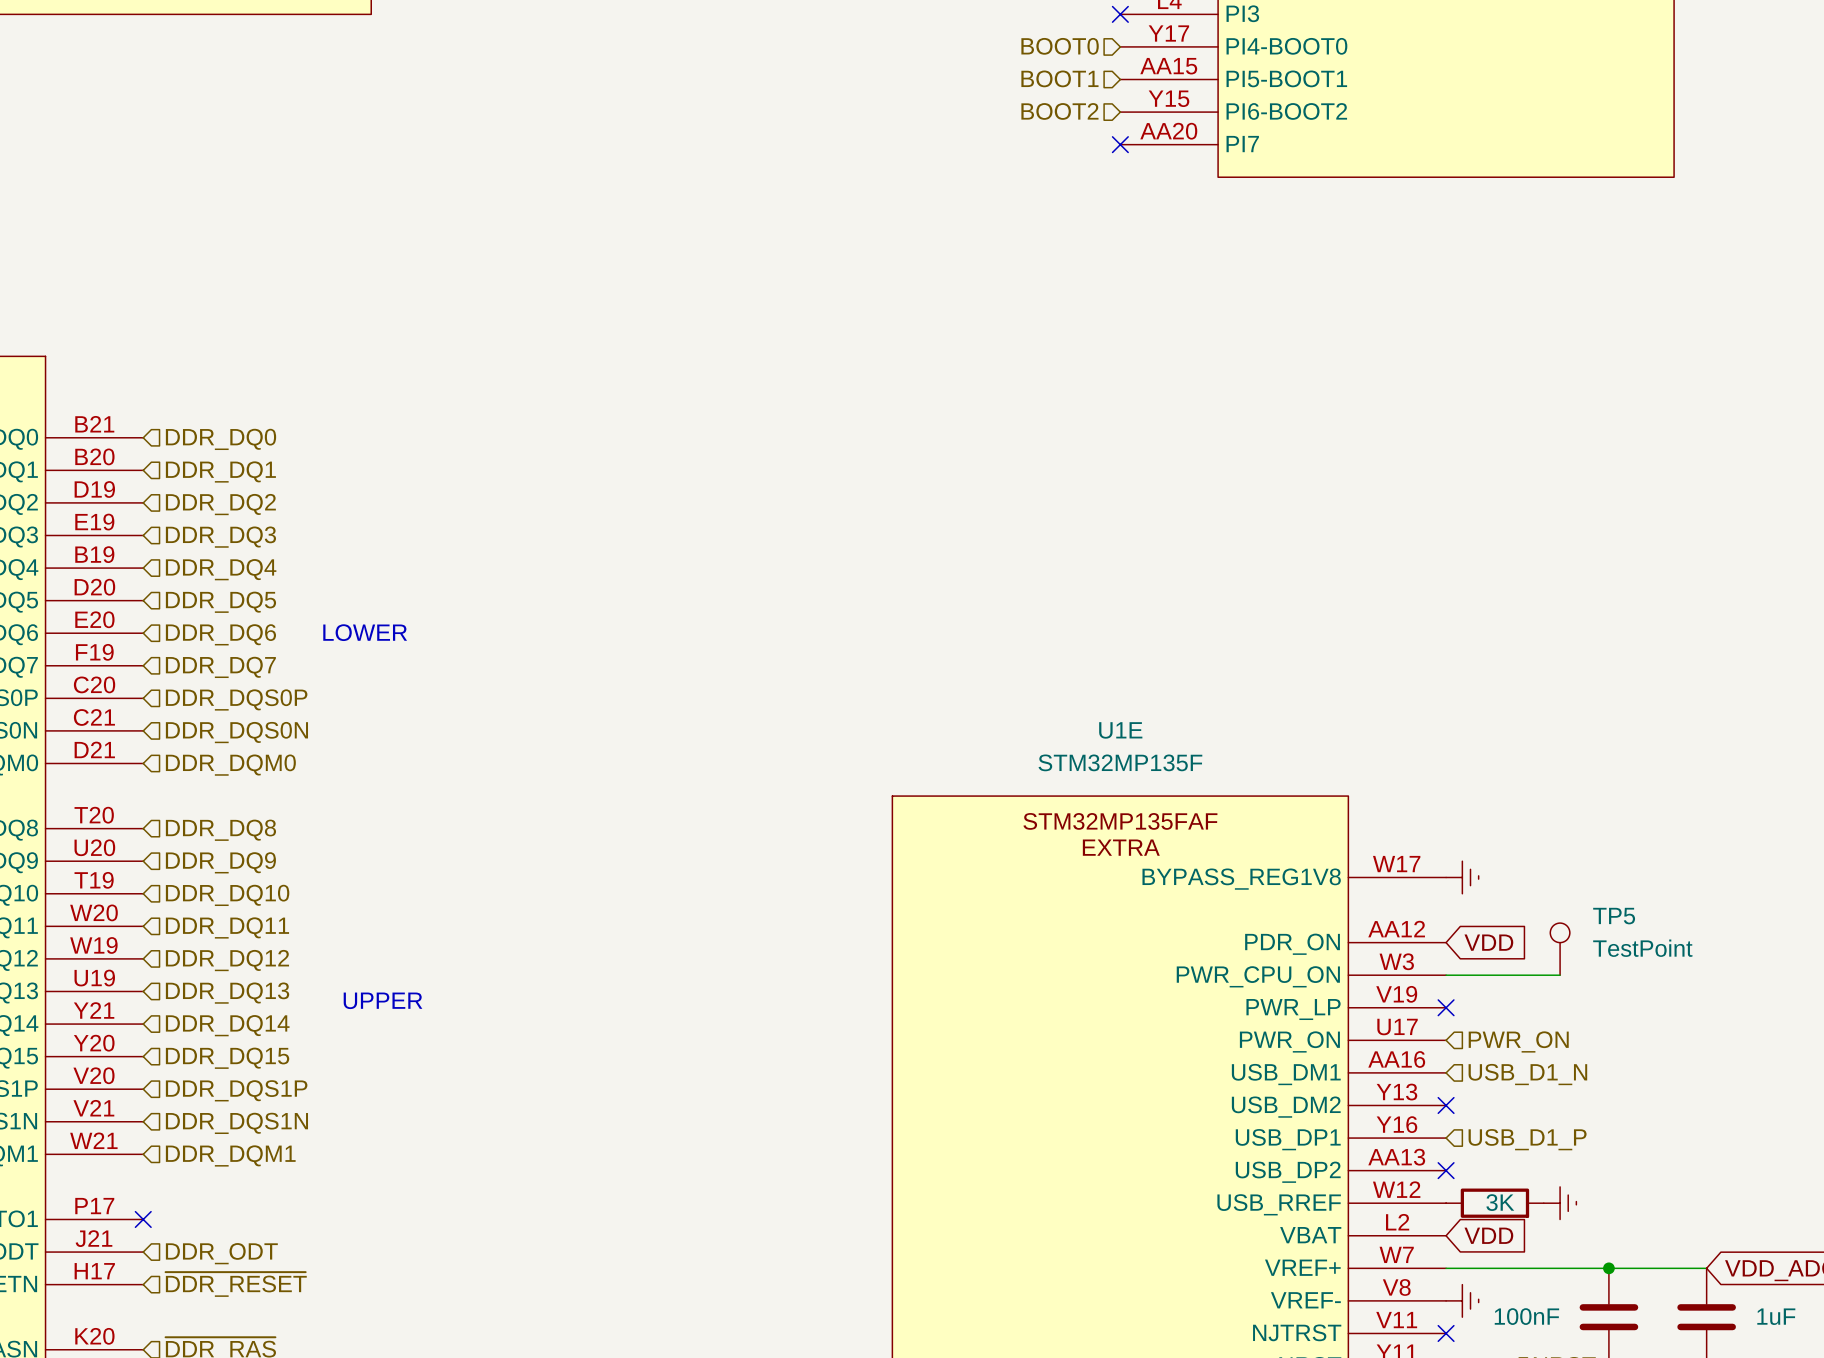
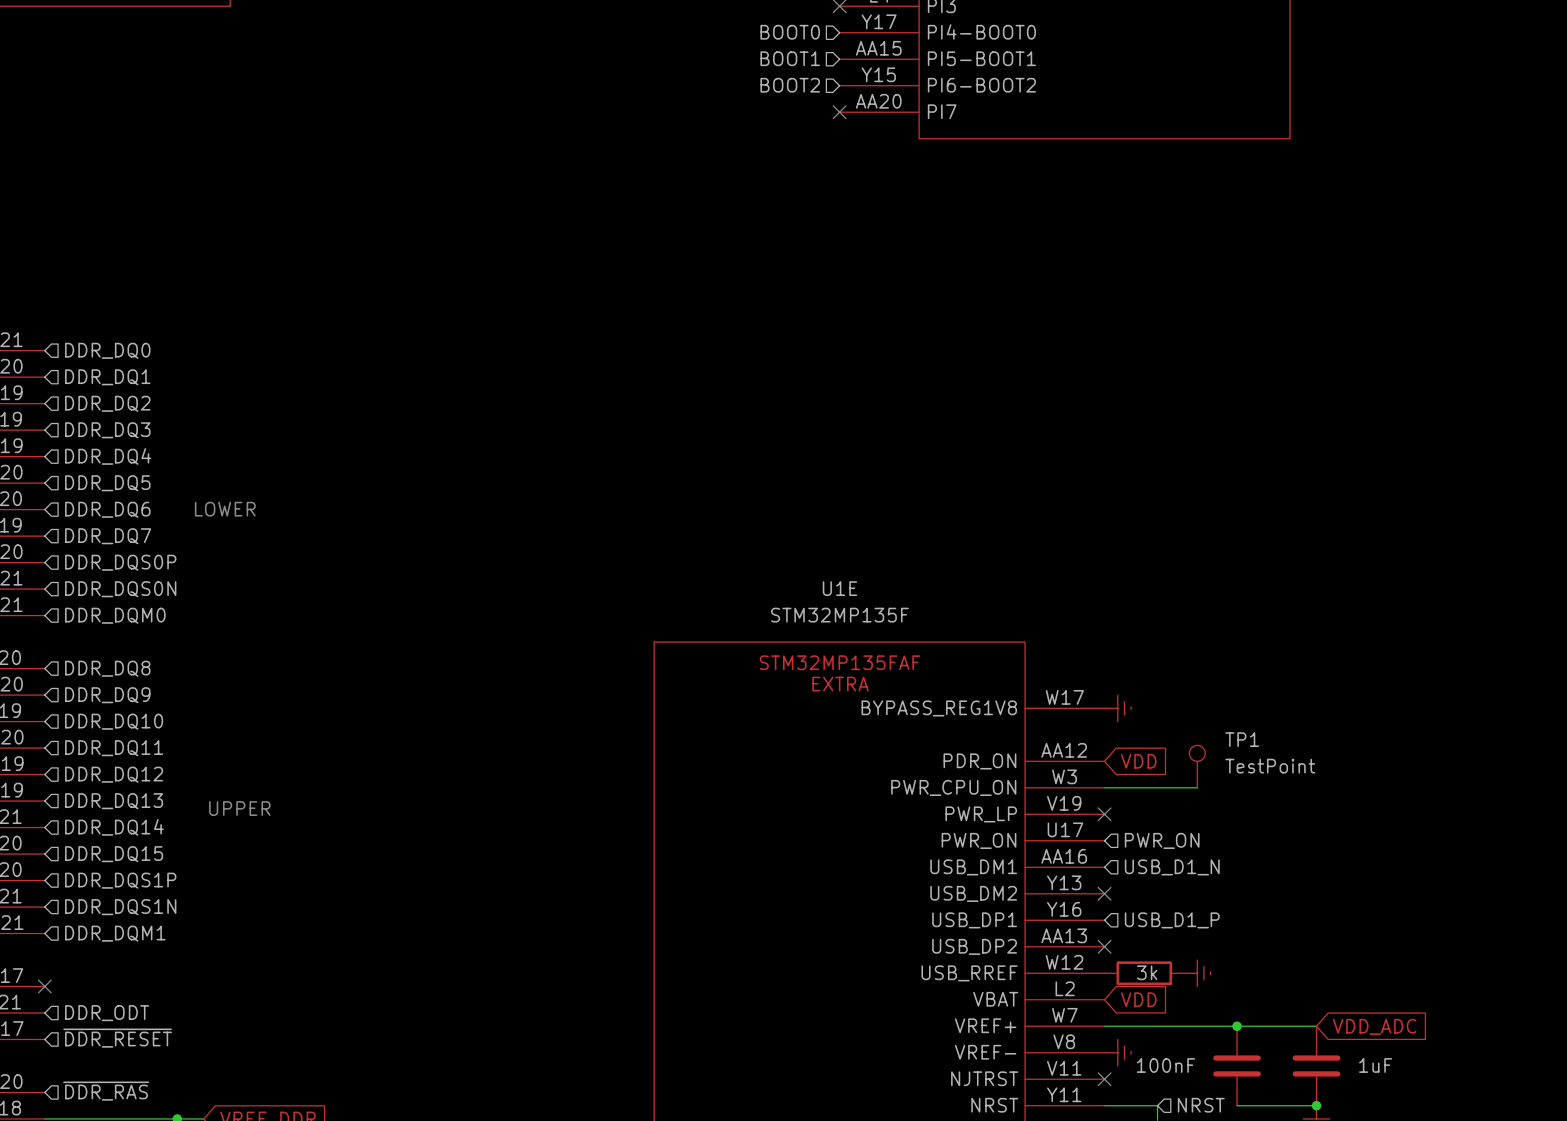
TP5 name: TP5 (1614, 916) -> TP1 (1242, 739)
part value: 3K (1500, 1202) -> 3k (1147, 972)

